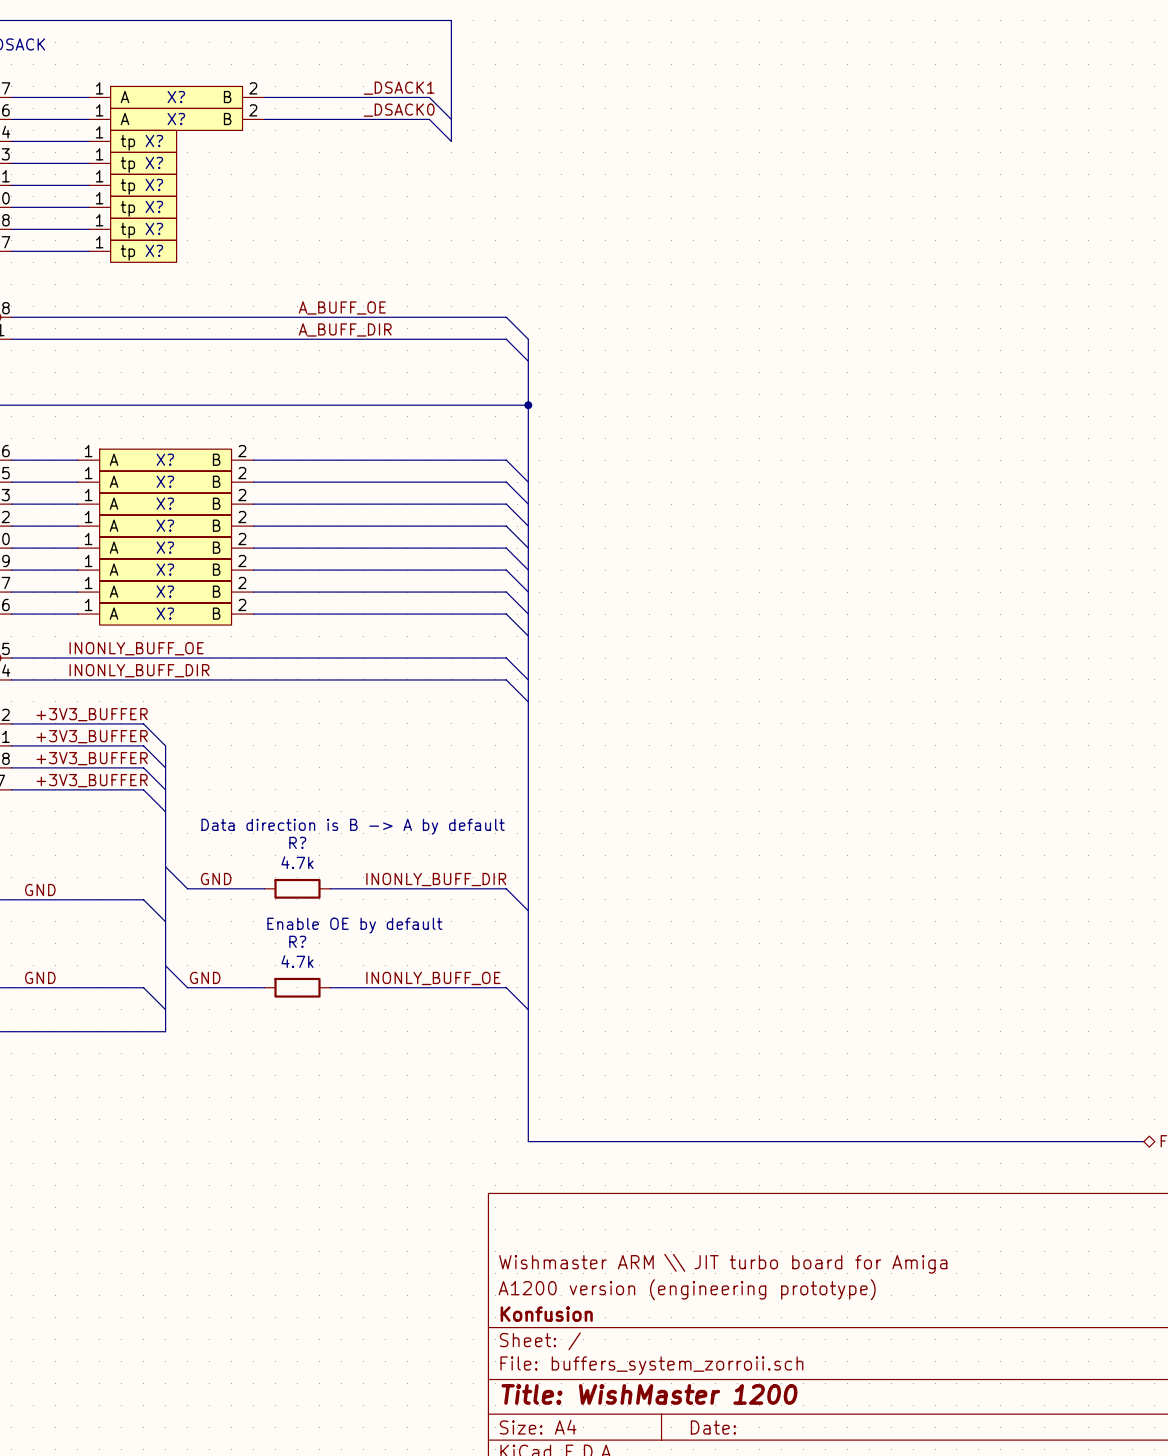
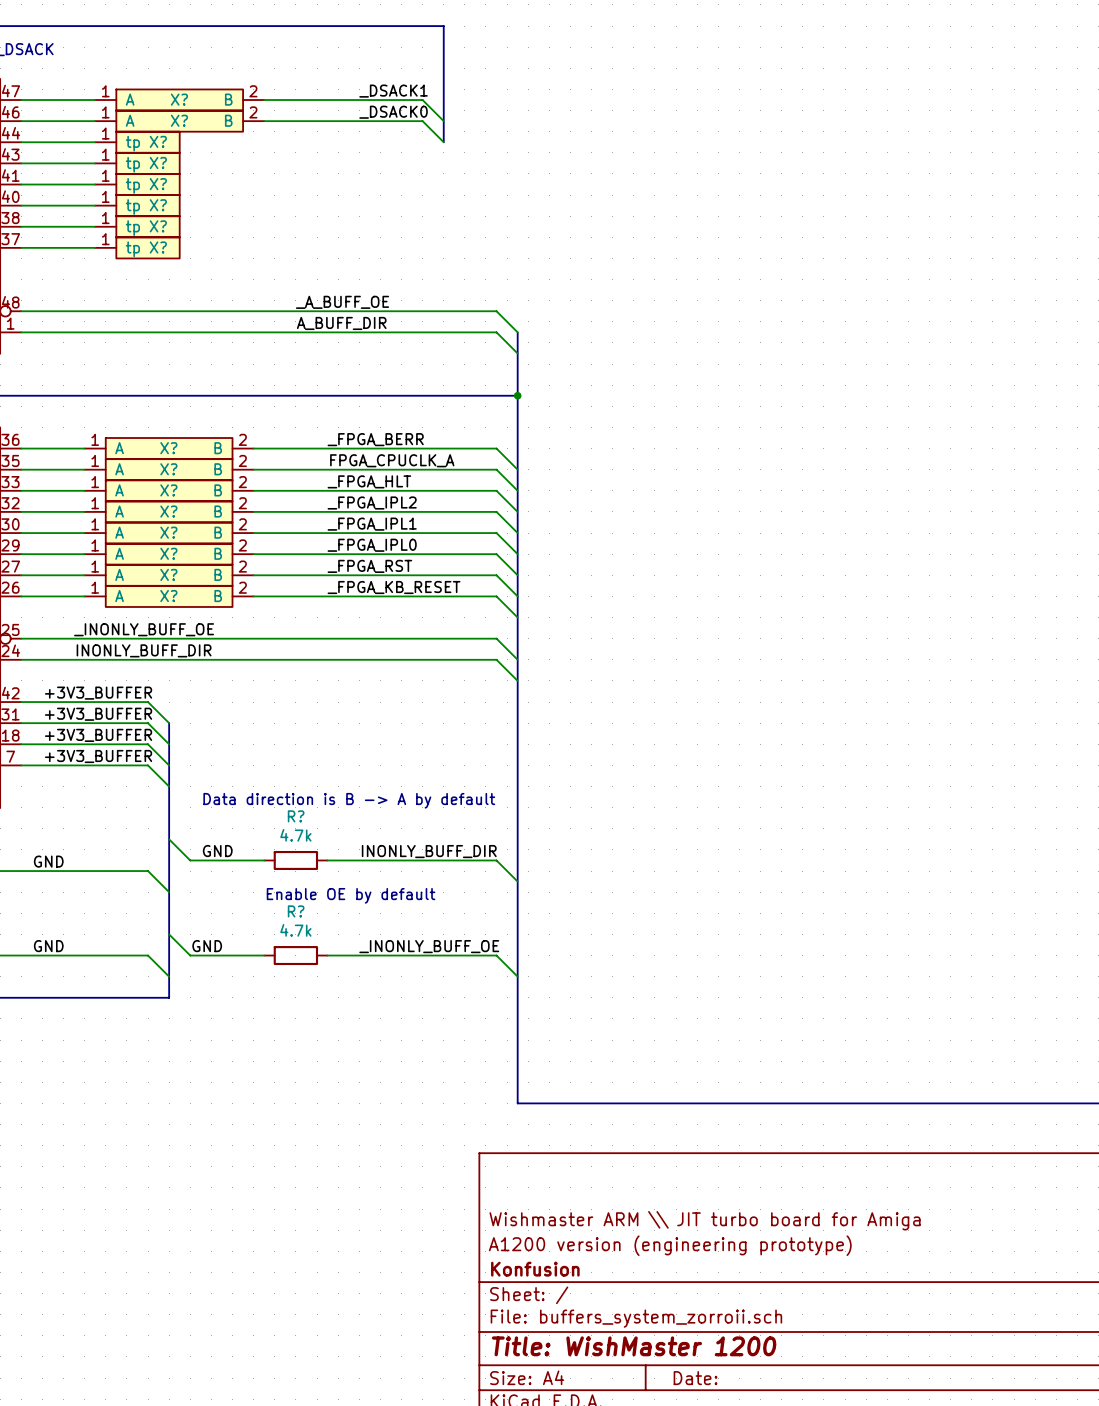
label: A_BUFF_OE (342, 307) -> _A_BUFF_OE (342, 302)
label: none -> _FPGA_BERR (375, 439)
label: none -> FPGA_CPUCLK_A (392, 460)
label: none -> _FPGA_HLT (369, 481)
label: none -> _FPGA_IPL2 (372, 503)
label: none -> _FPGA_IPL1 (372, 524)
label: none -> _FPGA_IPL0 (372, 545)
label: none -> _FPGA_RST (369, 566)
label: none -> _FPGA_KB_RESET (394, 587)
label: INONLY_BUFF_OE (136, 648) -> _INONLY_BUFF_OE (144, 629)
label: INONLY_BUFF_OE (433, 978) -> _INONLY_BUFF_OE (429, 946)

